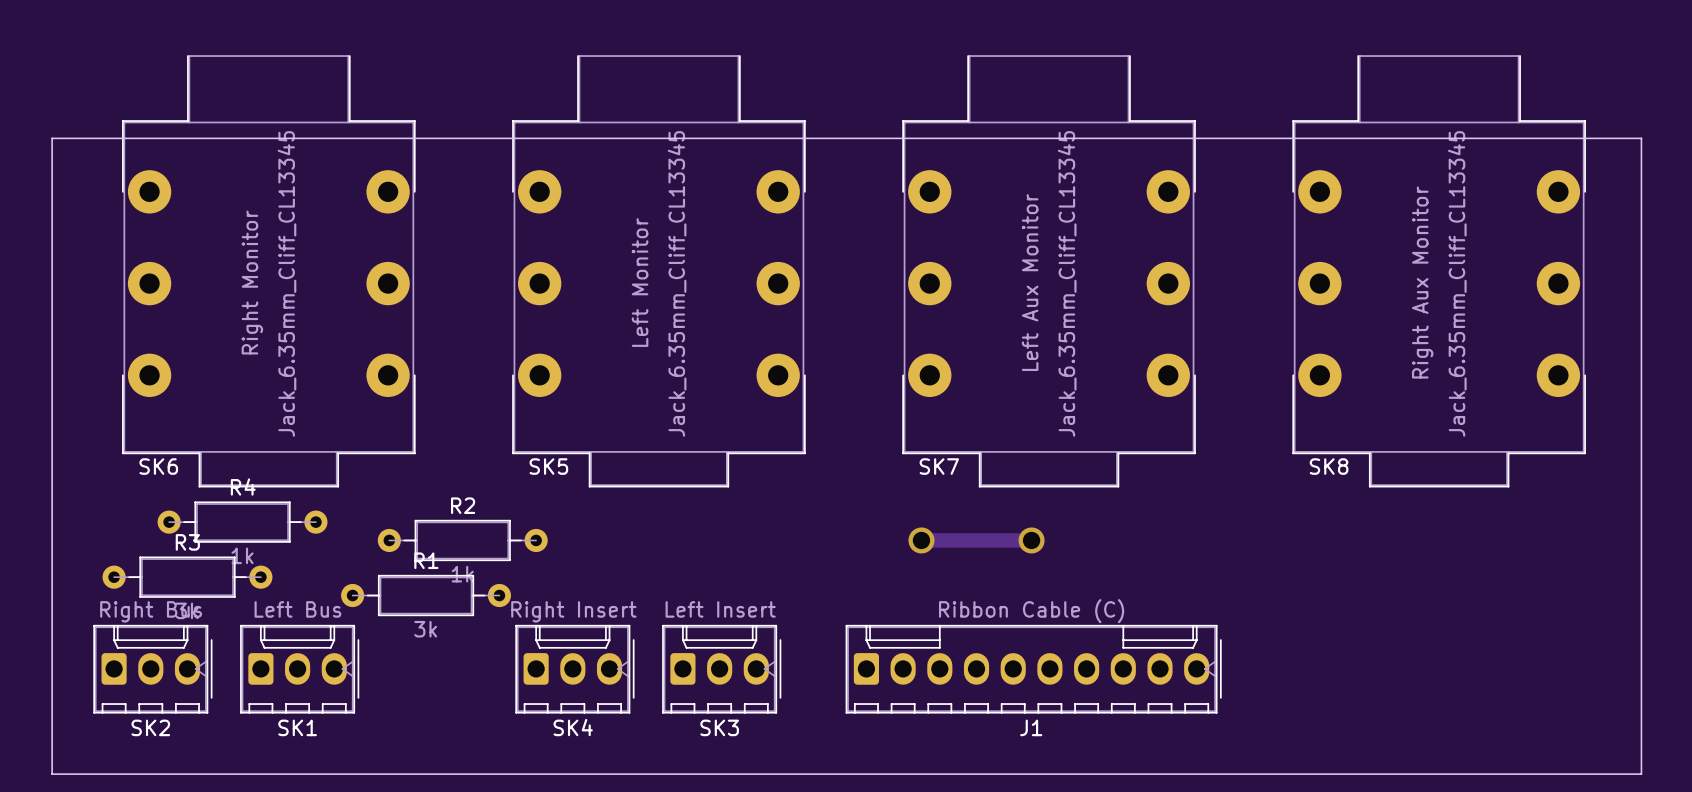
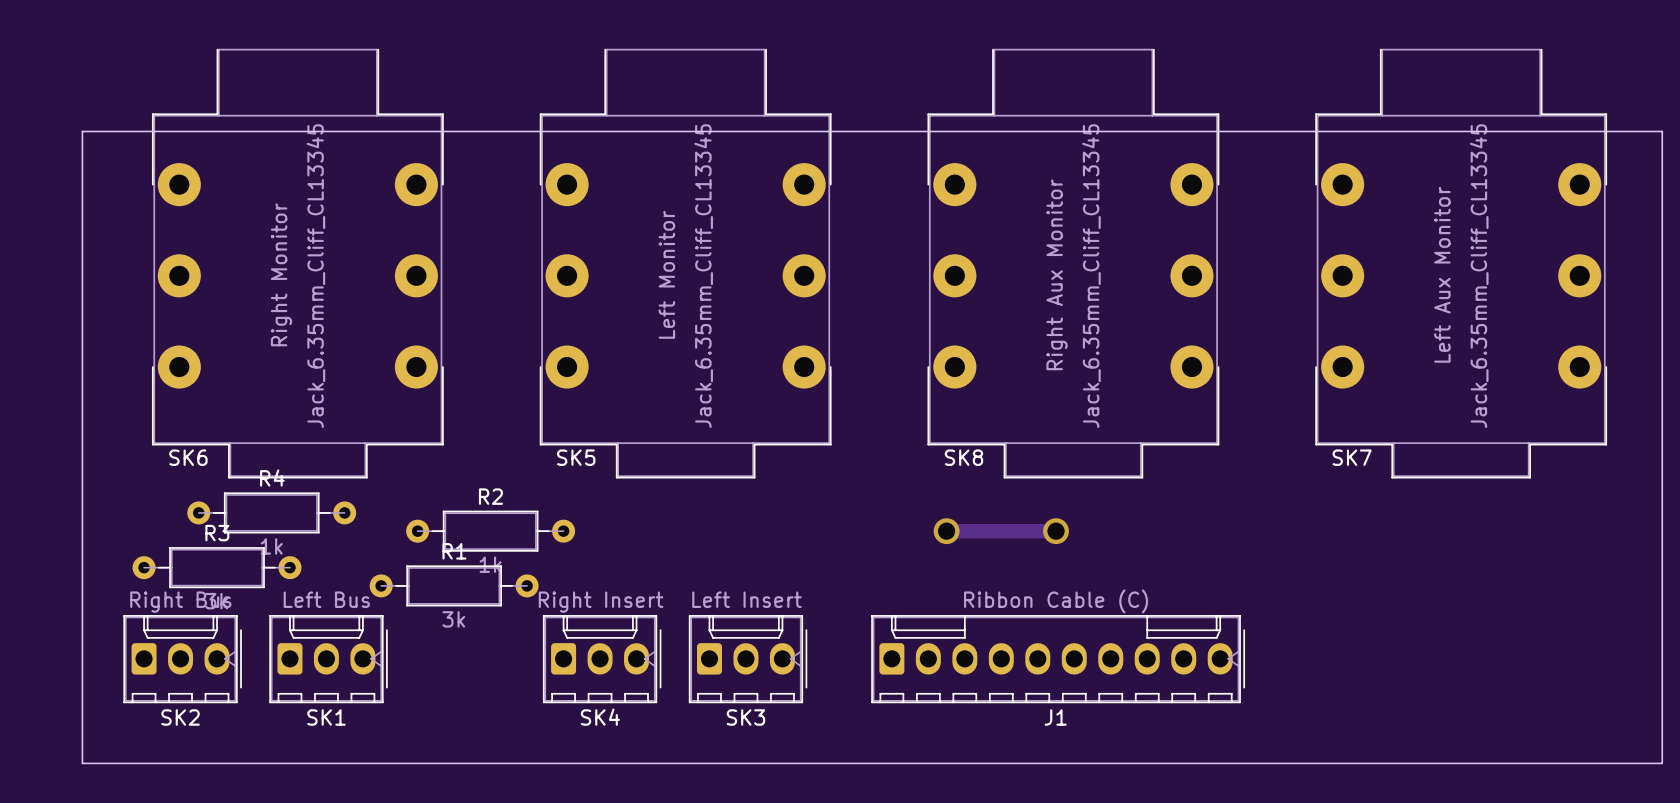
SK7 value: Left Aux Monitor (1030, 282) -> Right Aux Monitor (1057, 274)
SK8 value: Right Aux Monitor (1422, 282) -> Left Aux Monitor (1442, 274)
SK7 name: SK7 (939, 466) -> SK8 (963, 457)
SK8 name: SK8 (1329, 466) -> SK7 (1352, 457)

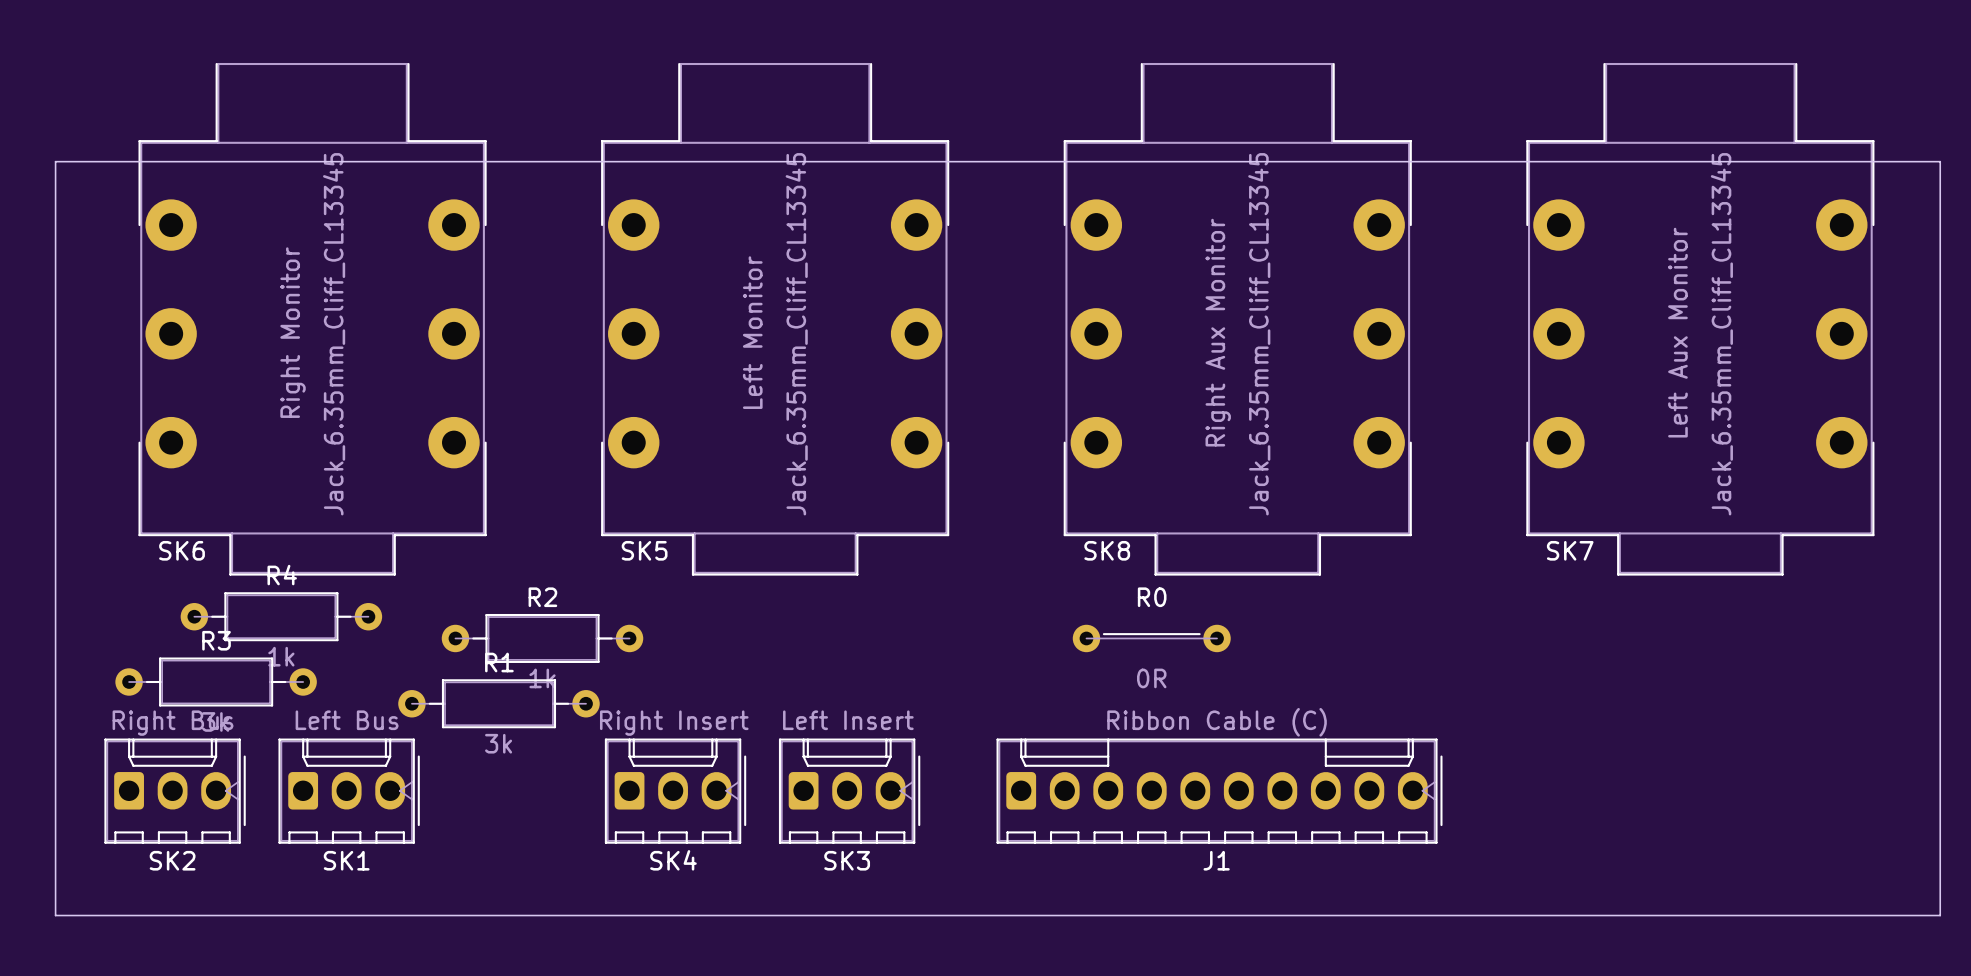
track: (946, 531) (1056, 531) -> none
via: (946, 531) -> none
R0: none -> 0R (1151, 638)
via: (1056, 531) -> none

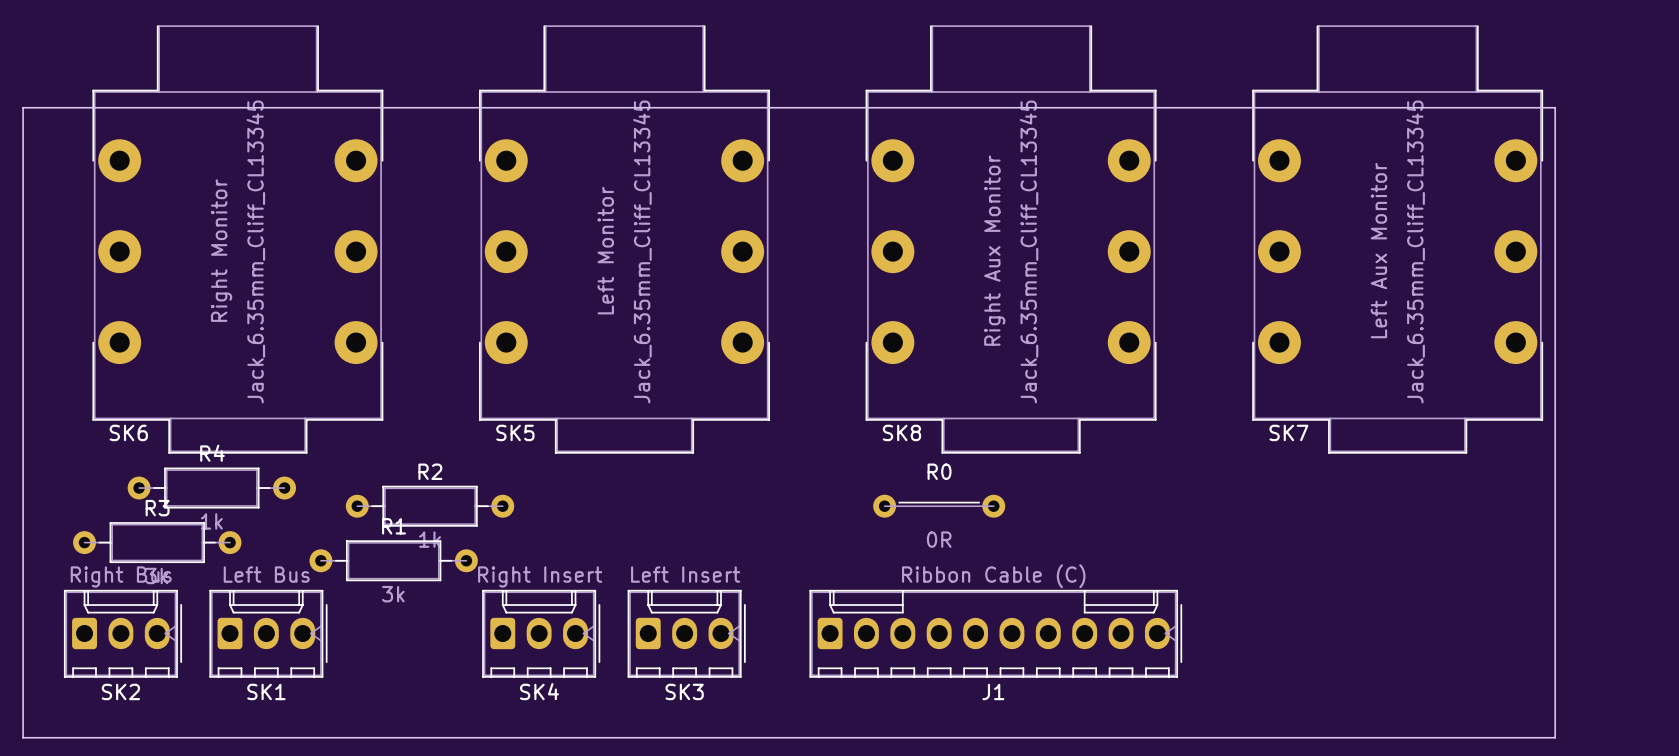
board edge: (1888, 161) (1940, 161) (1940, 915) (1888, 915) -> (1555, 107) (1555, 737)

